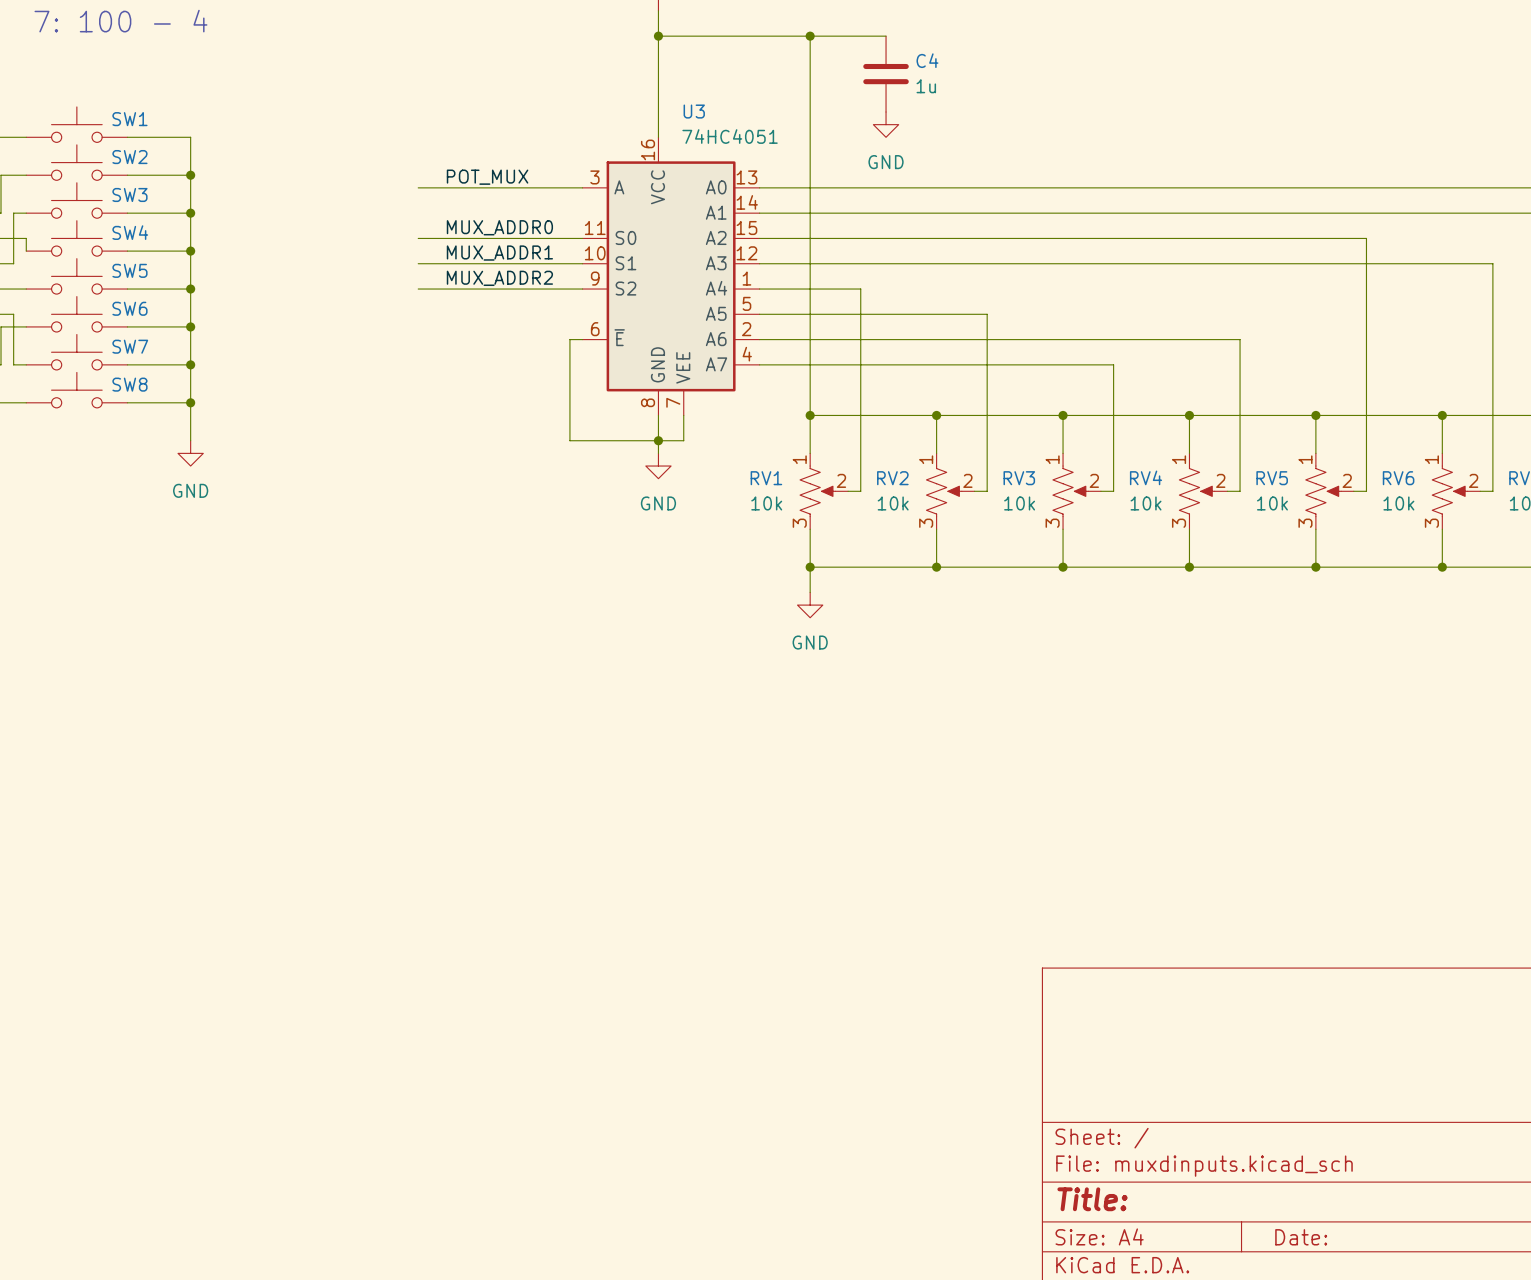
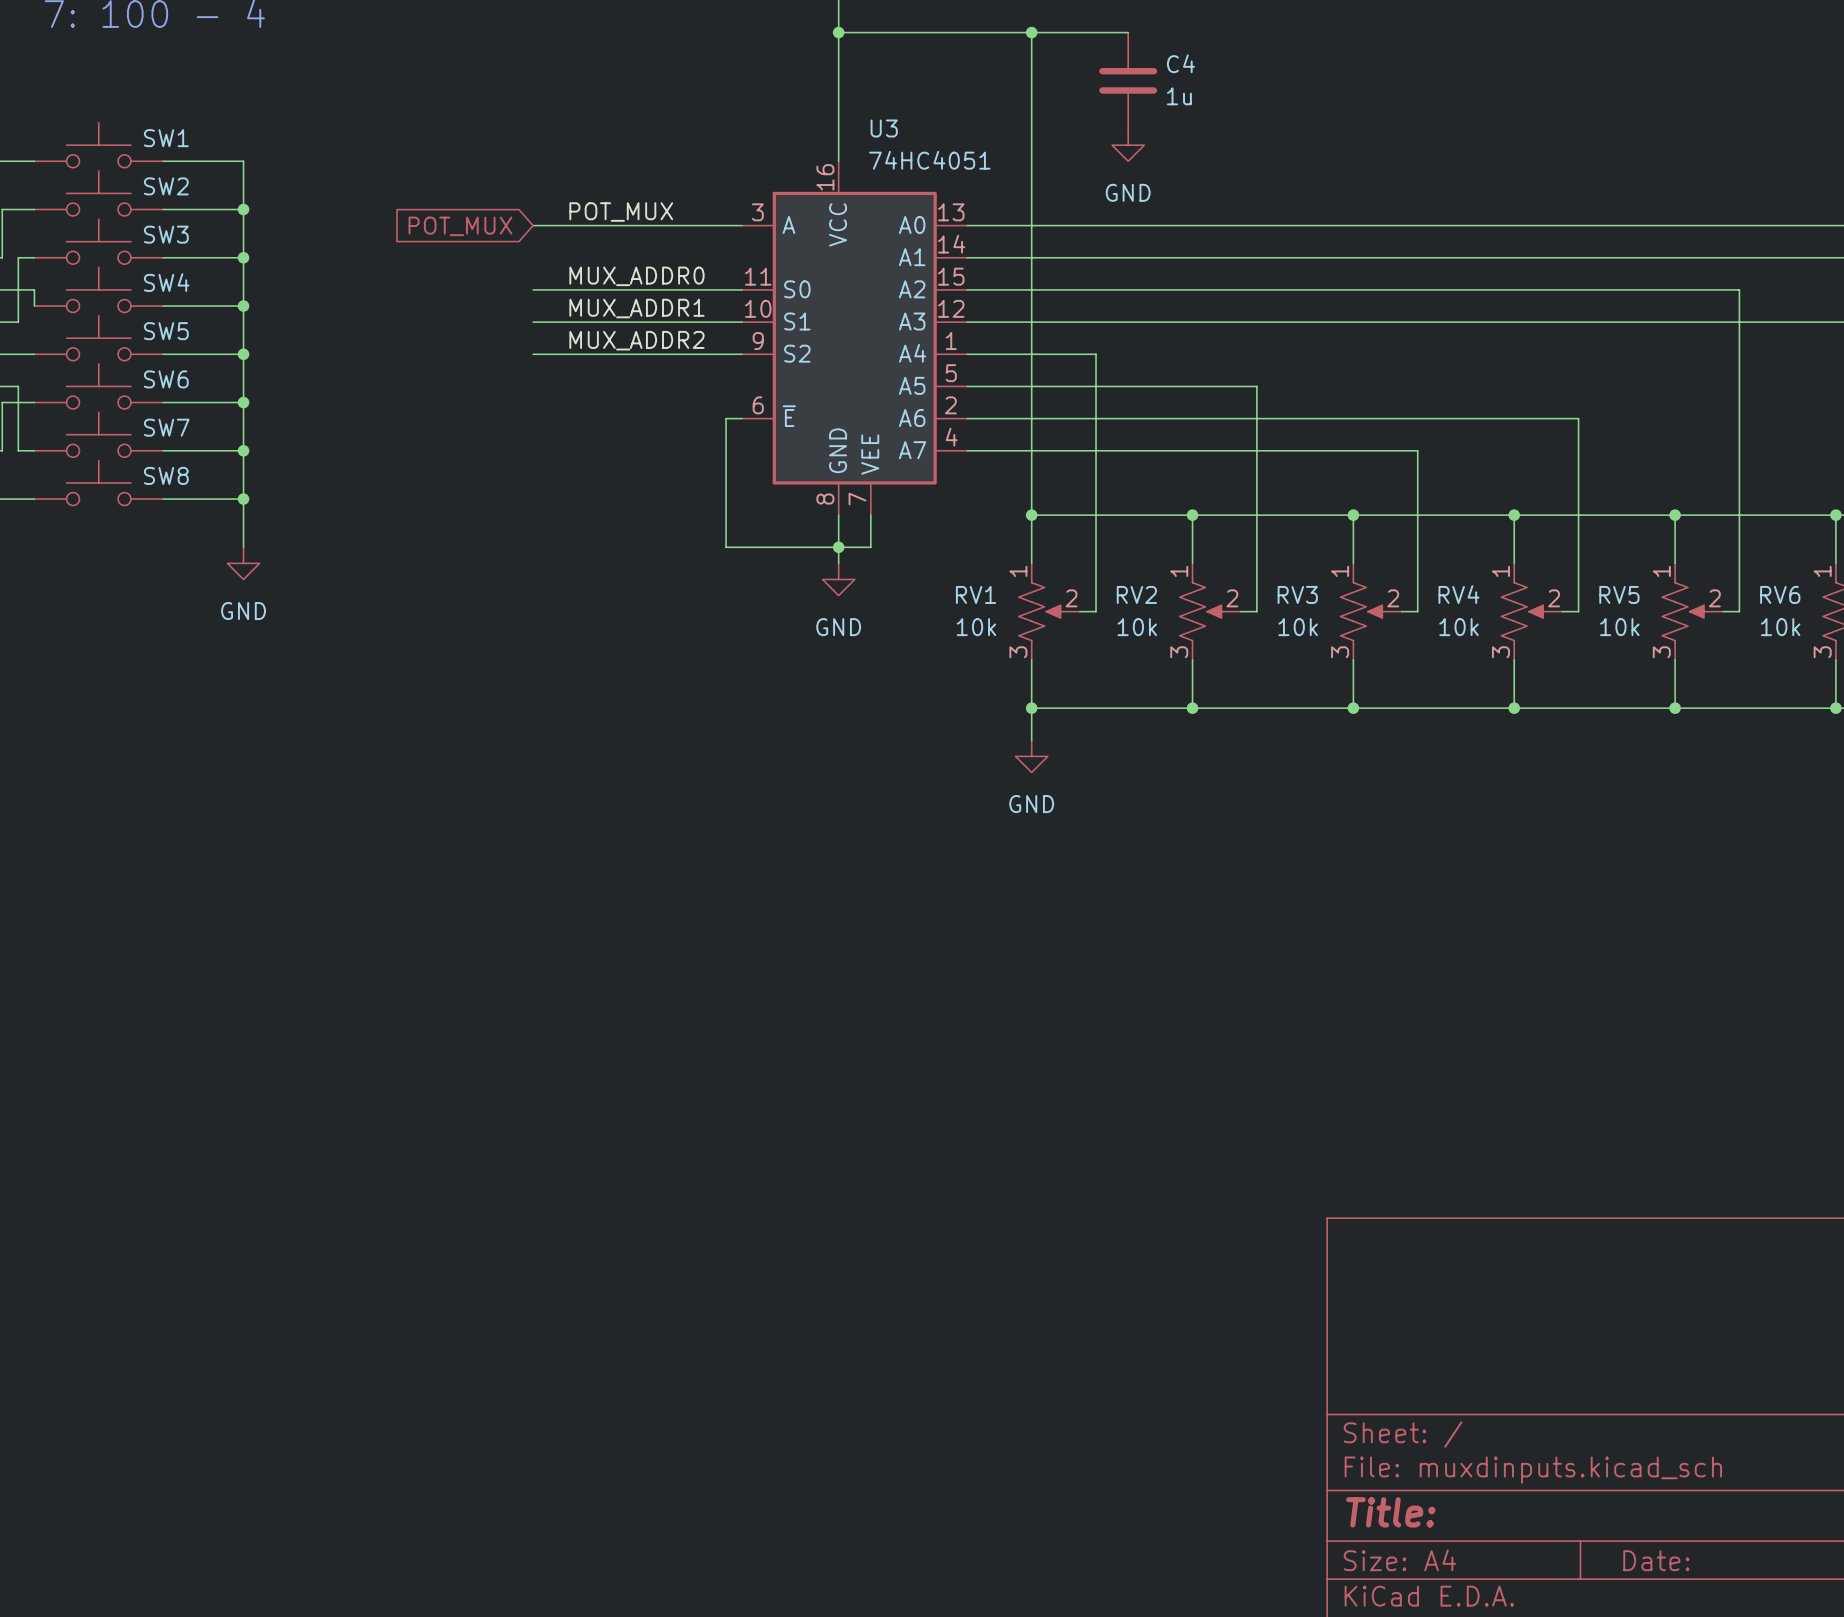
global label: none -> POT_MUX (460, 226)

